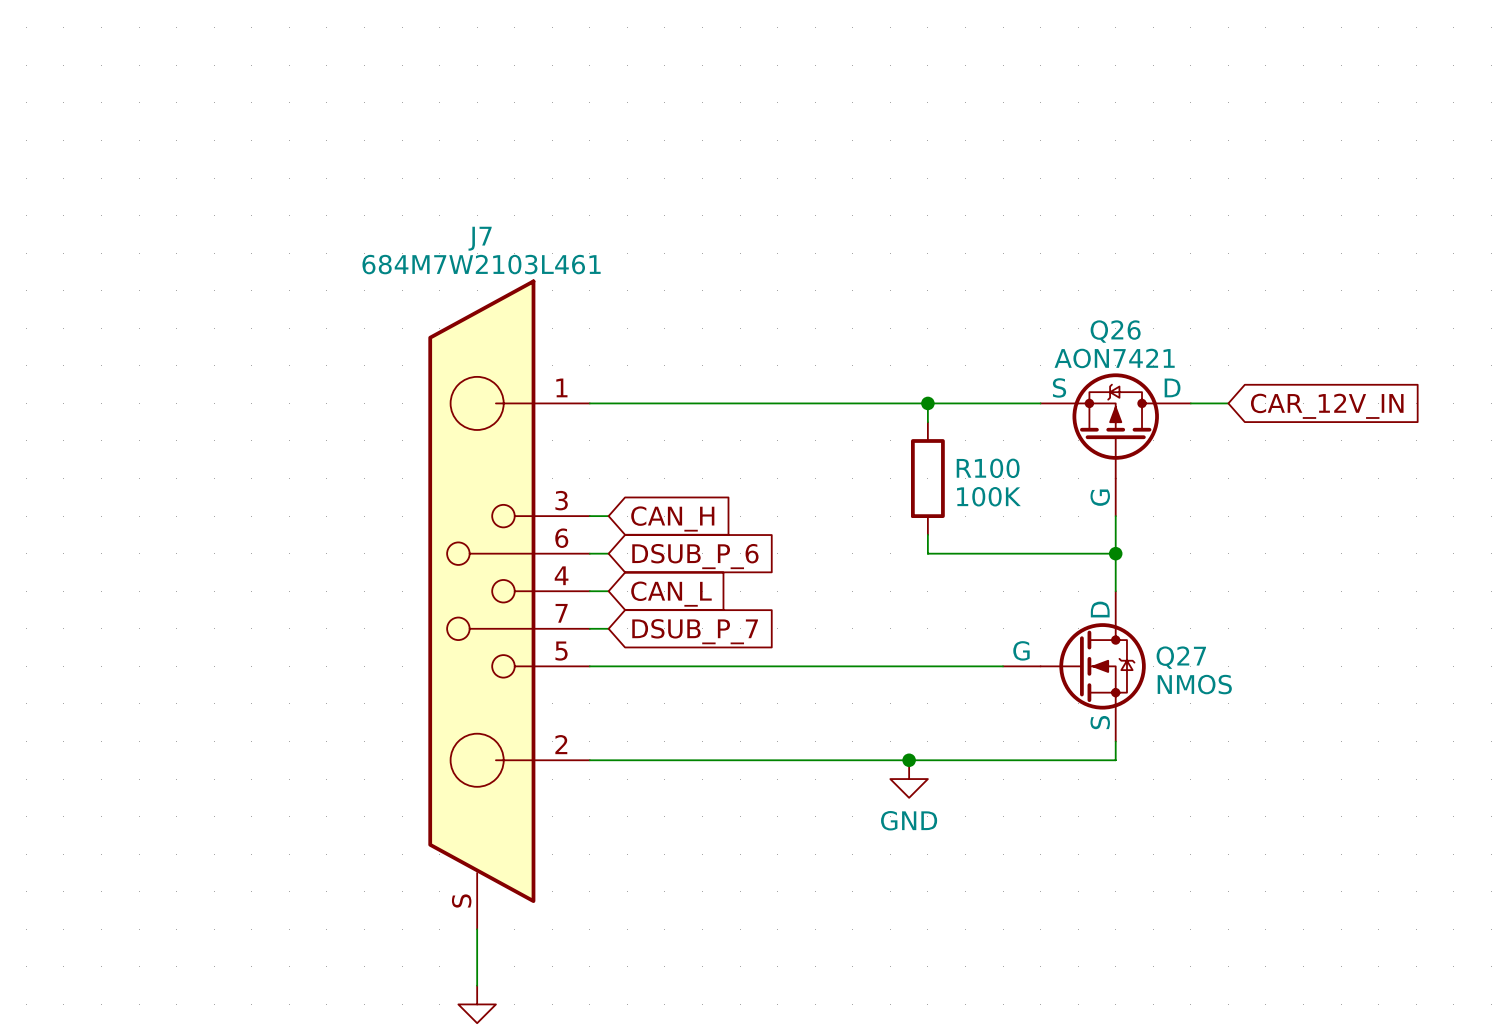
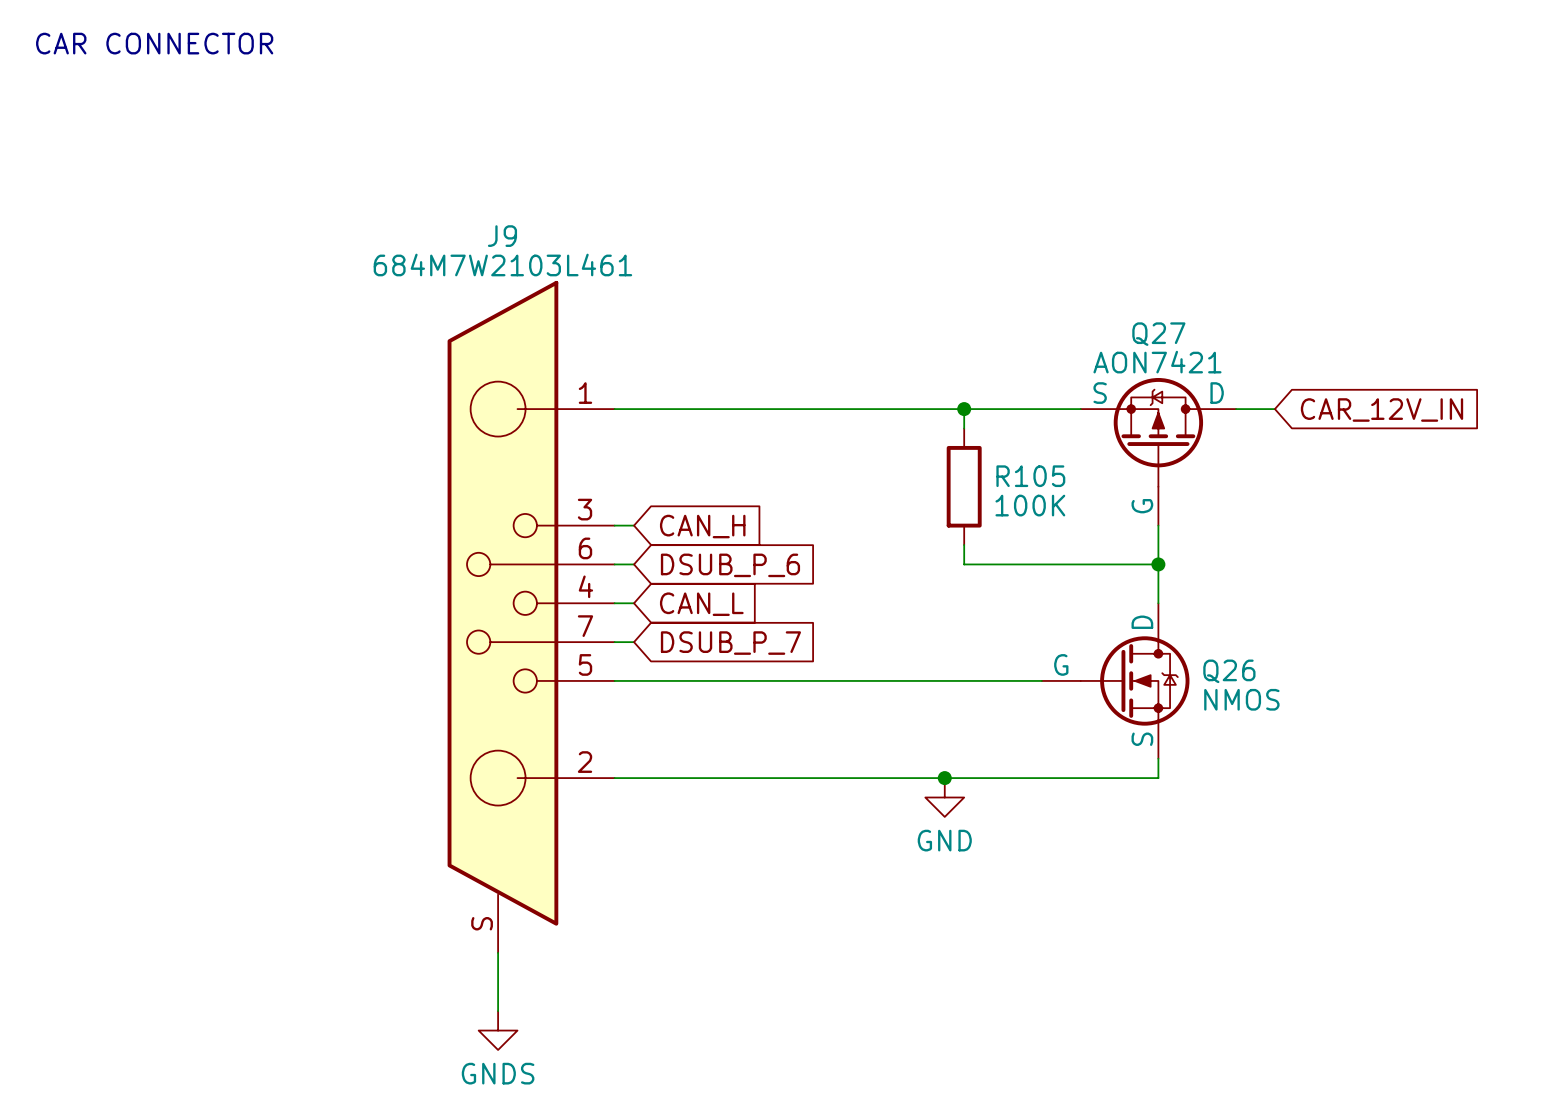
text: none -> CAR CONNECTOR (154, 43)
J7 name: J7 (480, 238) -> J9 (502, 236)
Q26 name: Q26 (1115, 331) -> Q27 (1158, 334)
R100 name: R100 (988, 468) -> R105 (1030, 476)
Q27 name: Q27 (1181, 657) -> Q26 (1229, 671)

